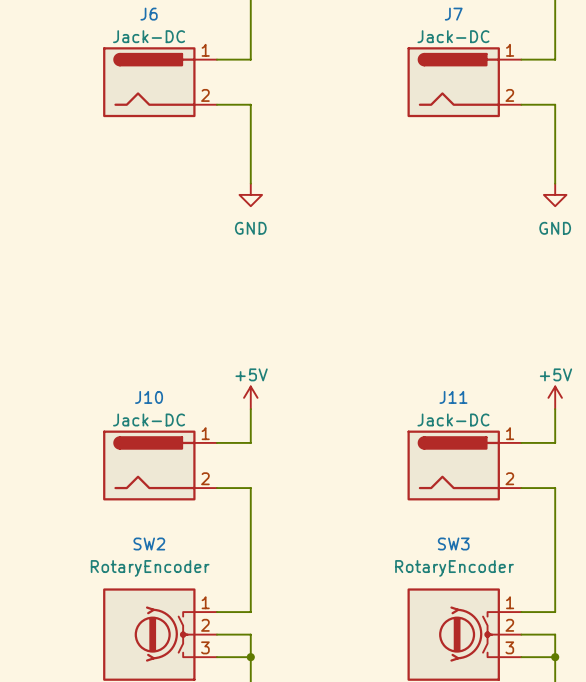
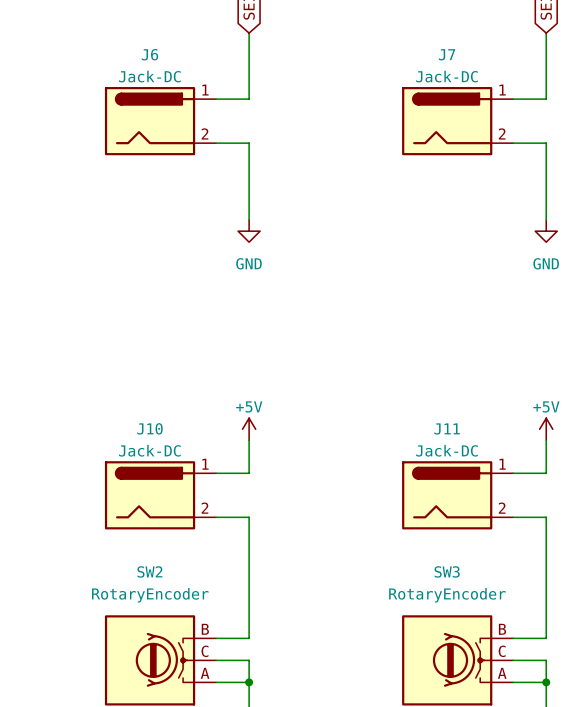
SW2 pin number: 1 (205, 602) -> B (205, 629)
SW3 pin number: 1 (510, 602) -> B (502, 629)
SW2 pin number: 2 (205, 625) -> C (205, 651)
SW3 pin number: 2 (509, 625) -> C (502, 651)
SW2 pin number: 3 (205, 647) -> A (205, 673)
SW3 pin number: 3 (509, 647) -> A (502, 673)

